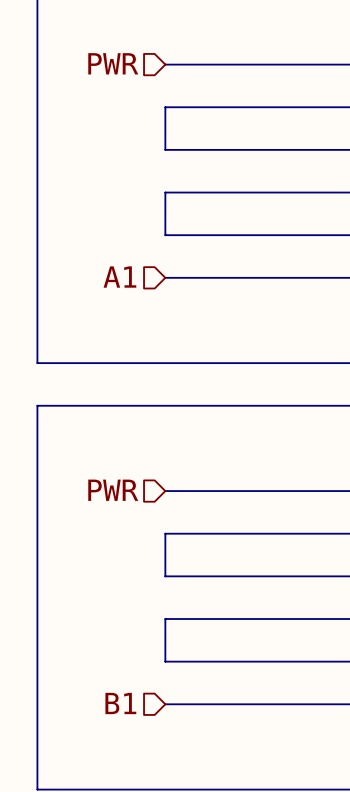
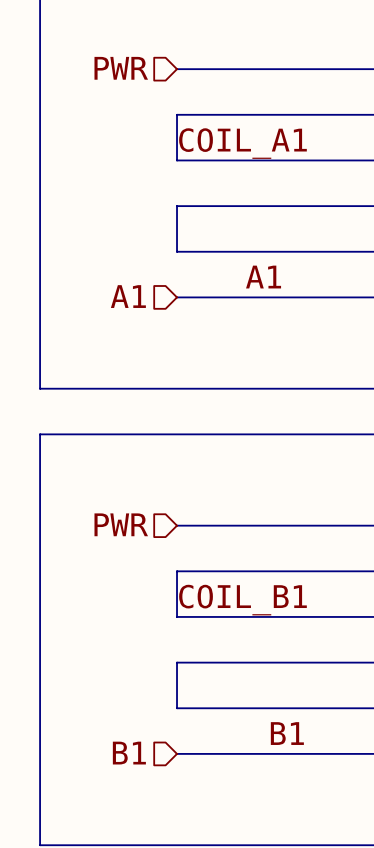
label: none -> COIL_A1 (242, 143)
label: none -> A1 (263, 277)
label: none -> COIL_B1 (242, 600)
label: none -> B1 (287, 733)

